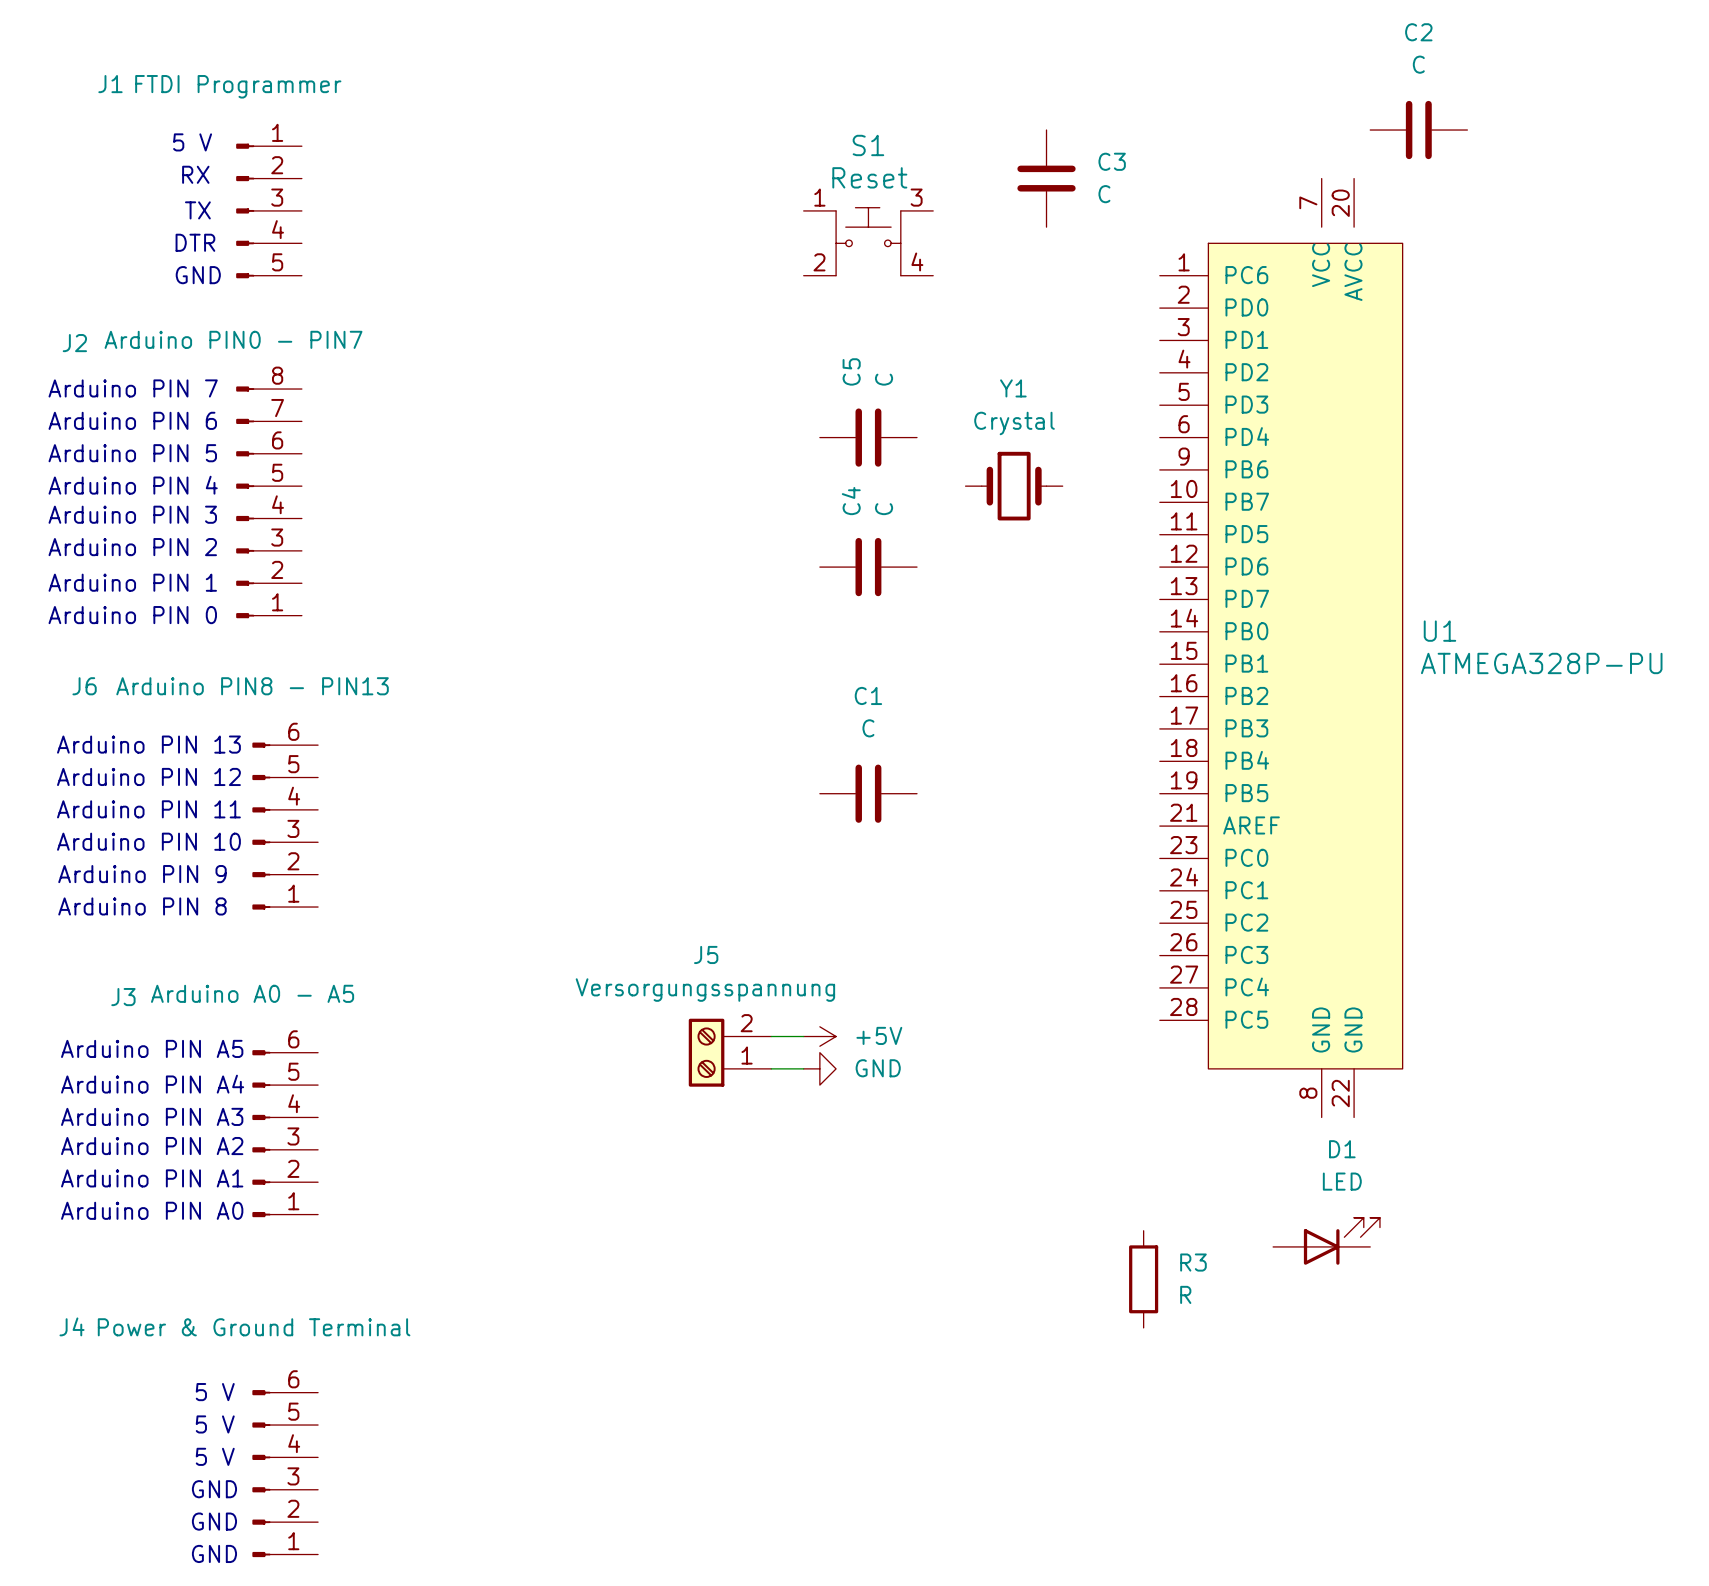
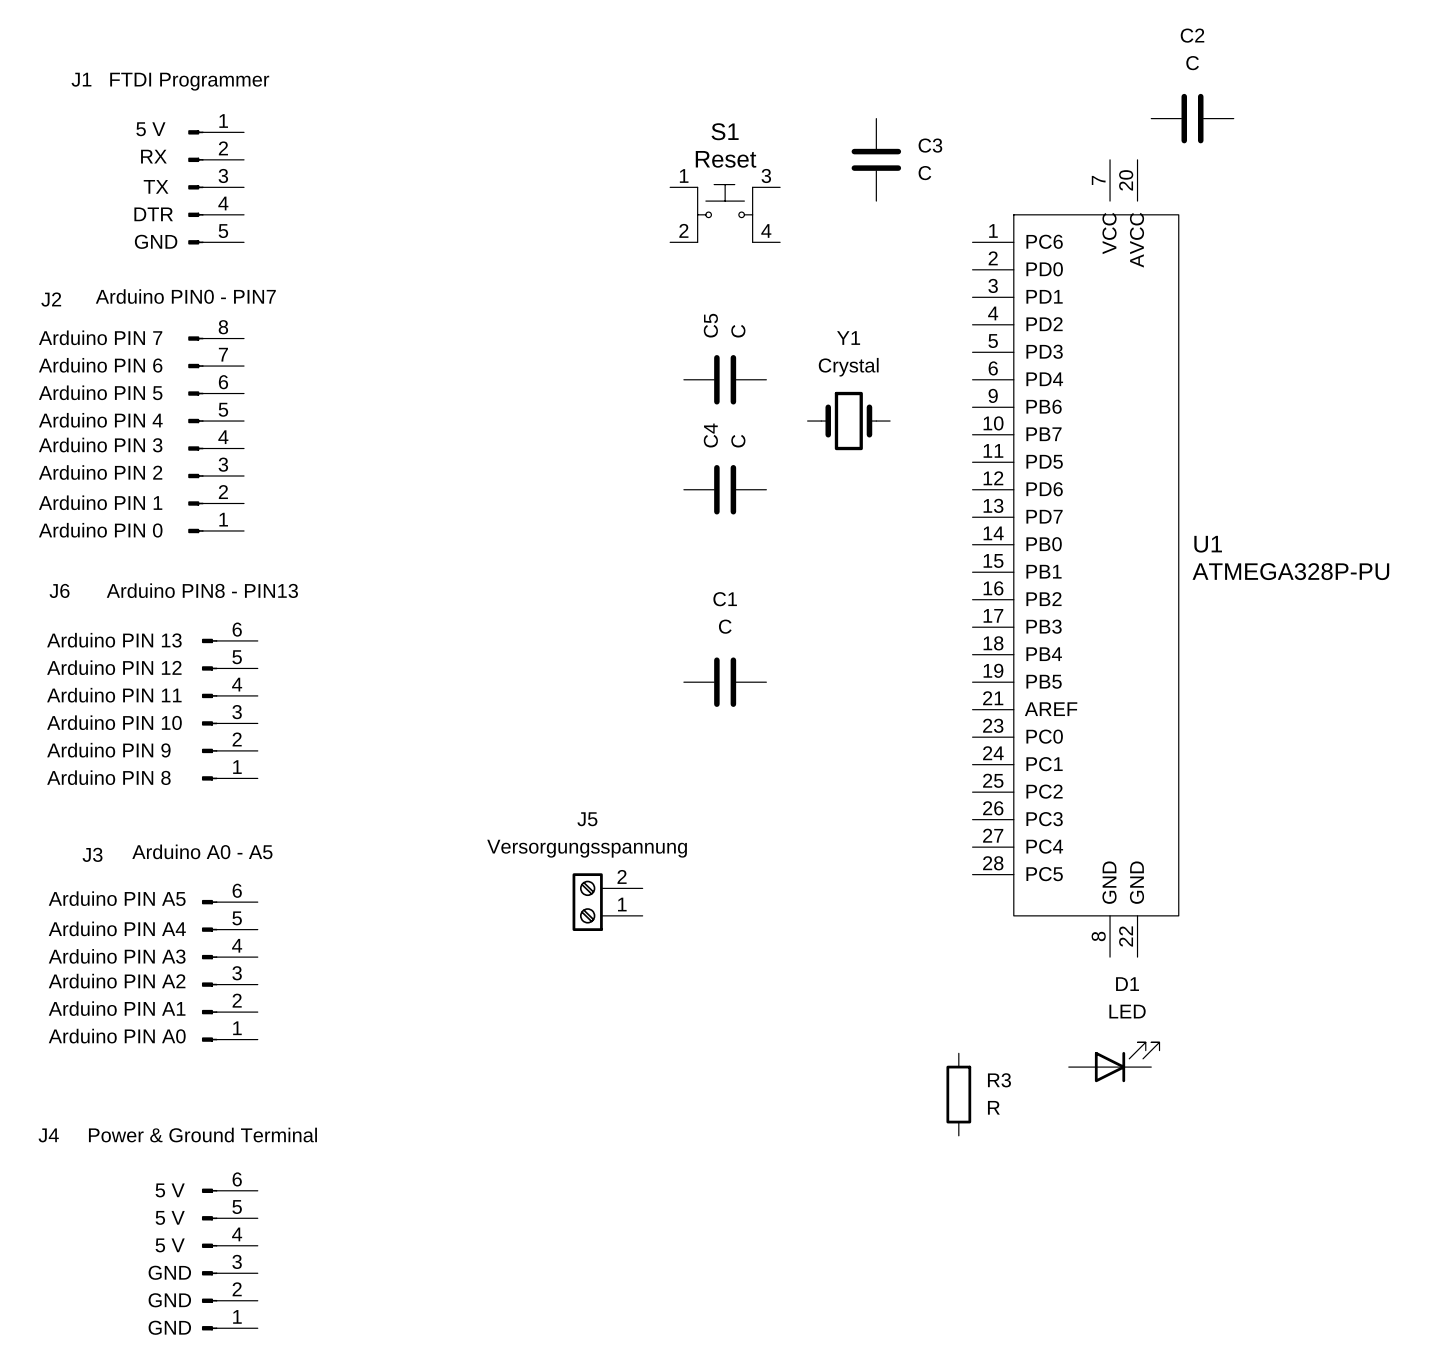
wire: (771, 1036) (803, 1036) -> none
power symbol: +5V (819, 1036) -> none
wire: (771, 1068) (803, 1068) -> none
power symbol: GND (819, 1068) -> none

